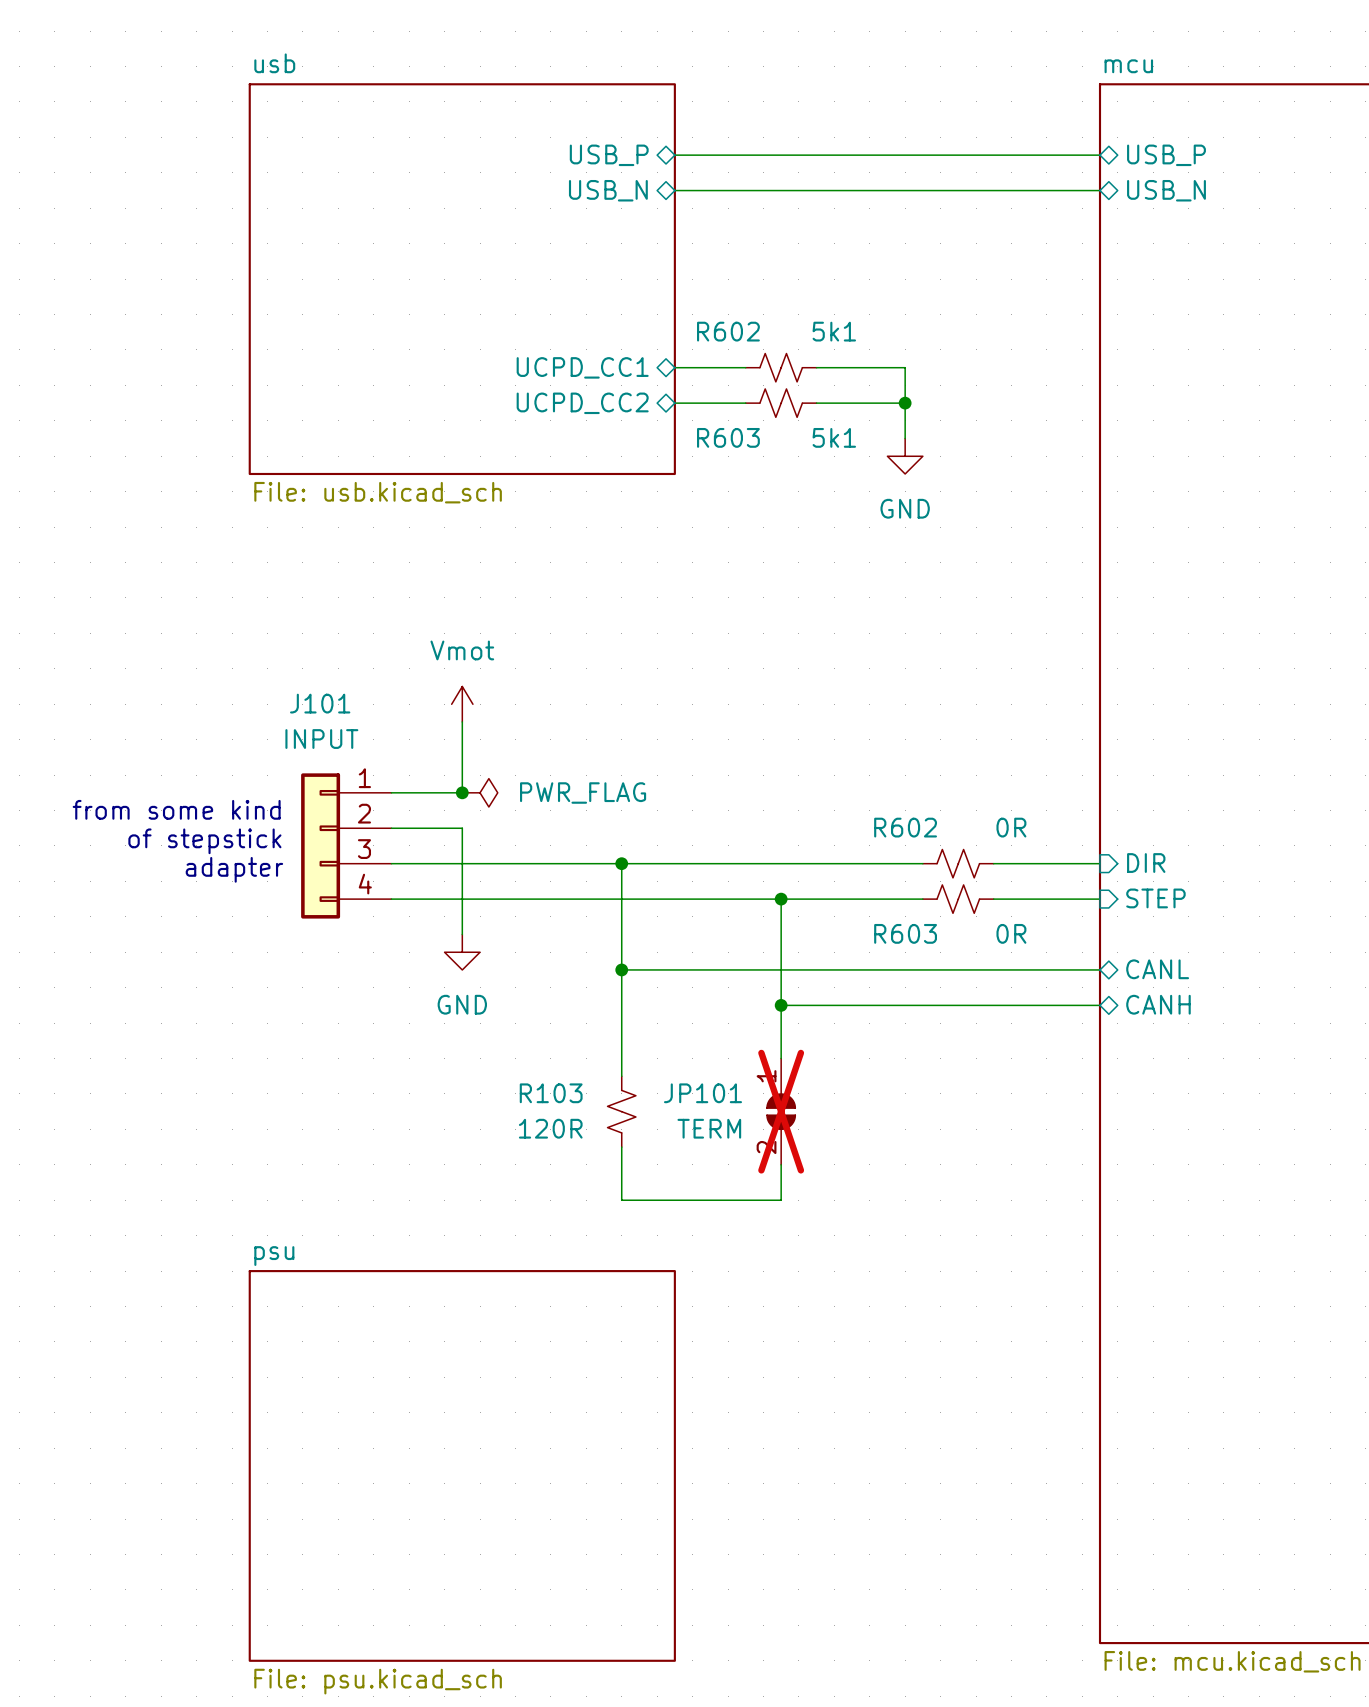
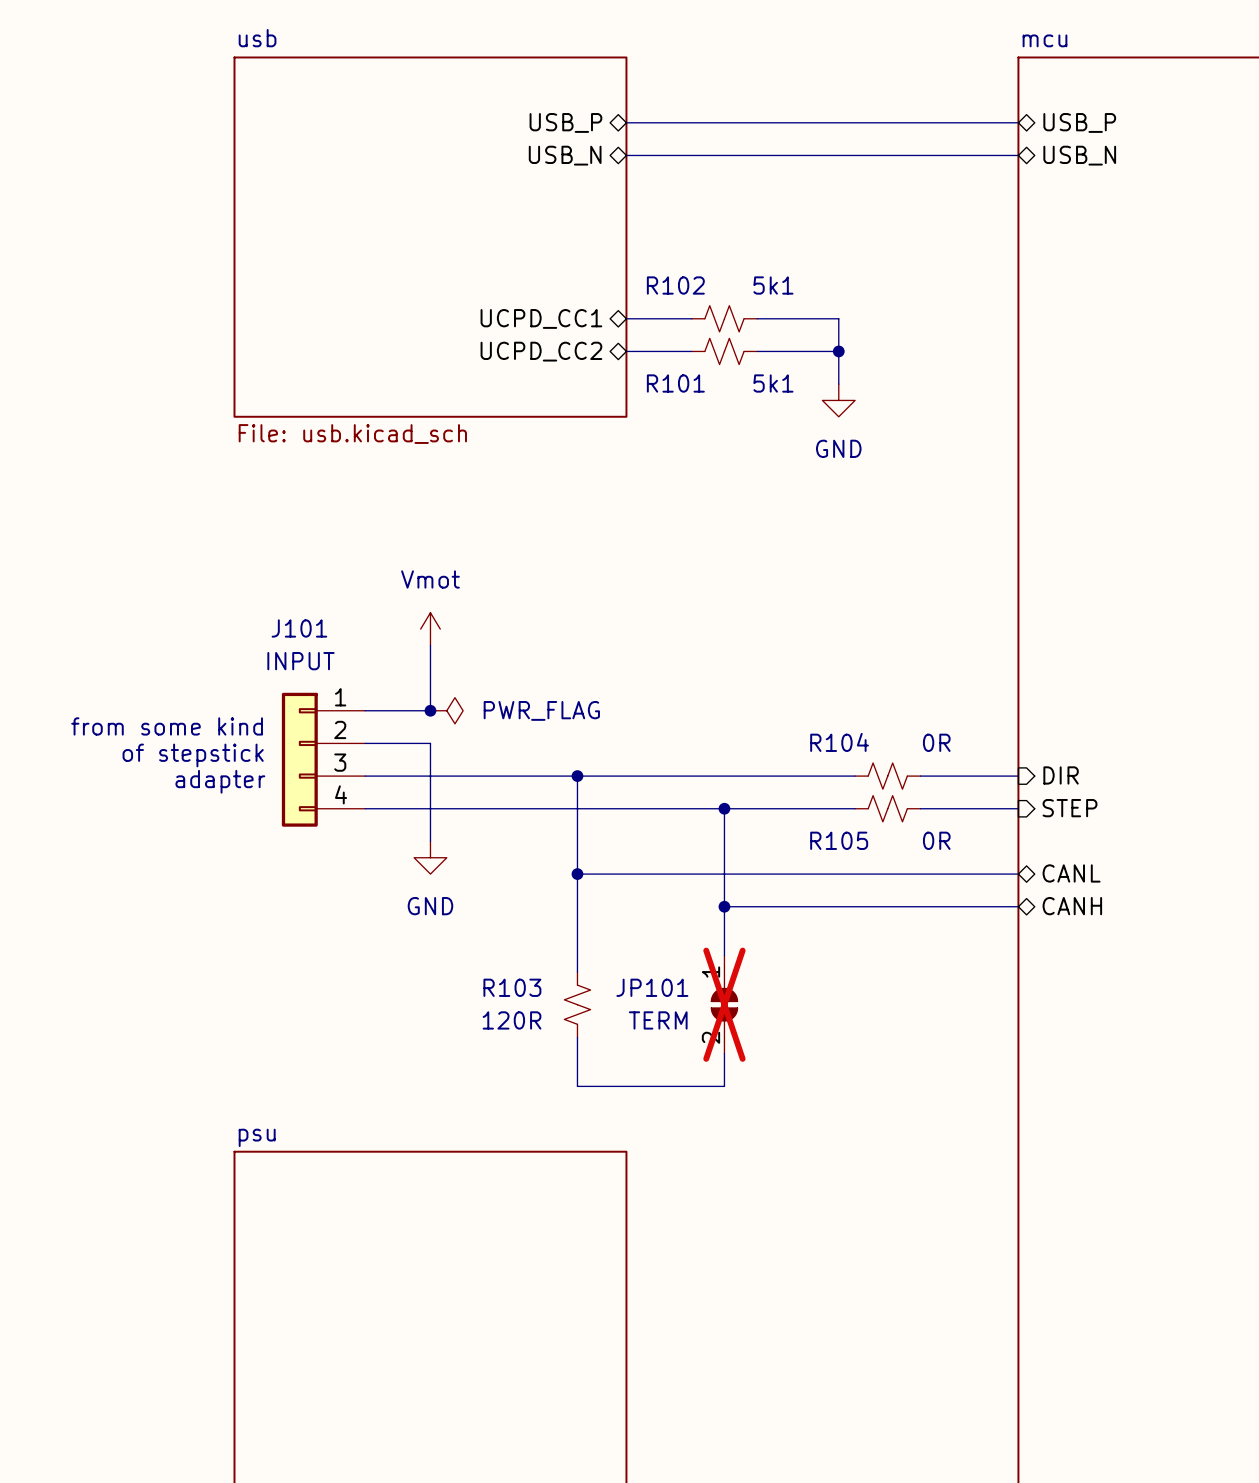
R602 name: R602 (728, 331) -> R102 (675, 285)
R603 name: R603 (728, 437) -> R101 (675, 383)
R602 name: R602 (905, 827) -> R104 (839, 742)
R603 name: R603 (905, 933) -> R105 (839, 840)

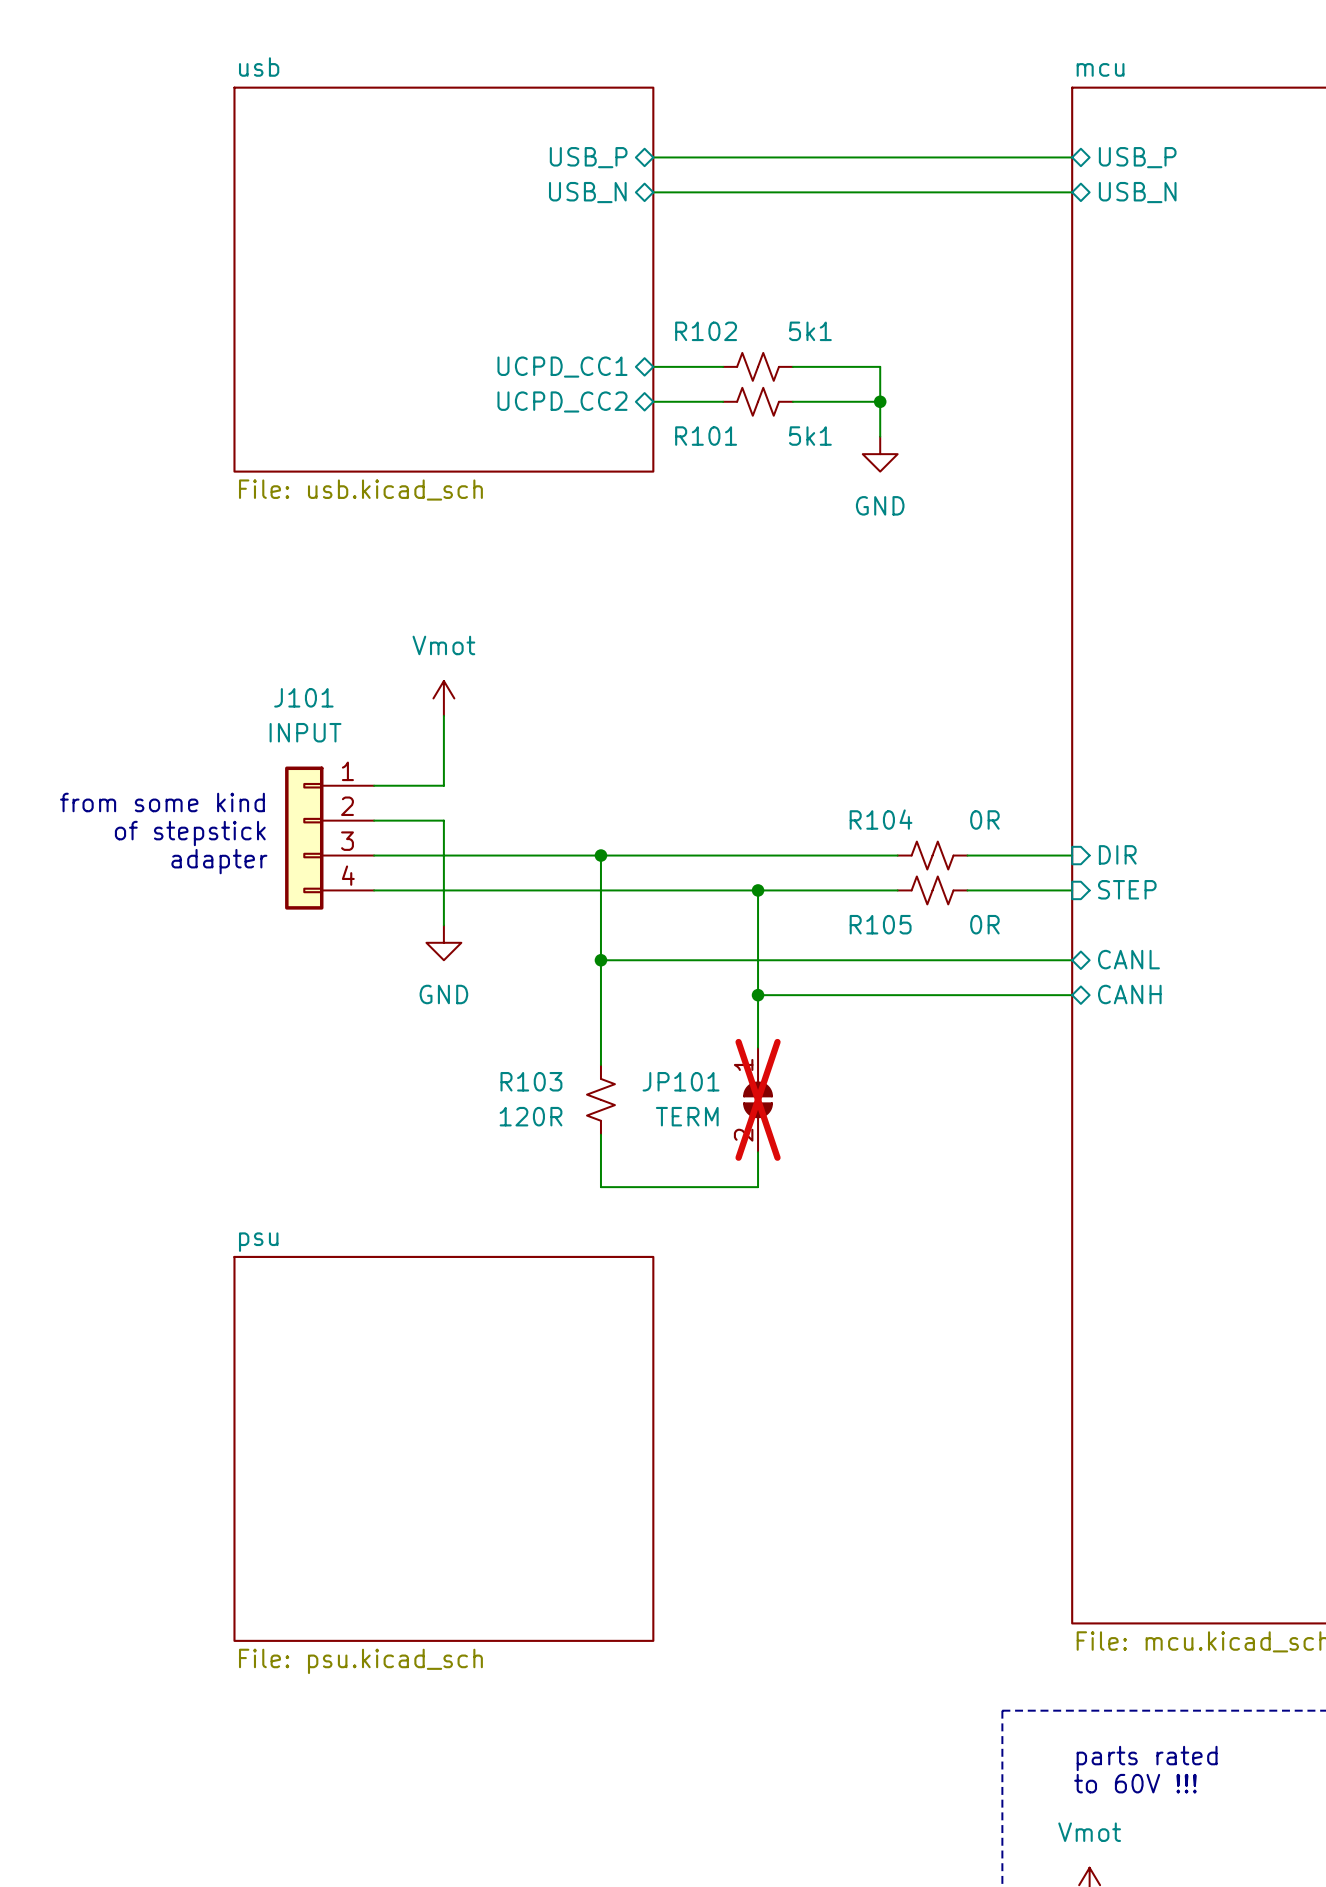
junction: (430, 710) -> none
power symbol: PWR_FLAG (446, 710) -> none

